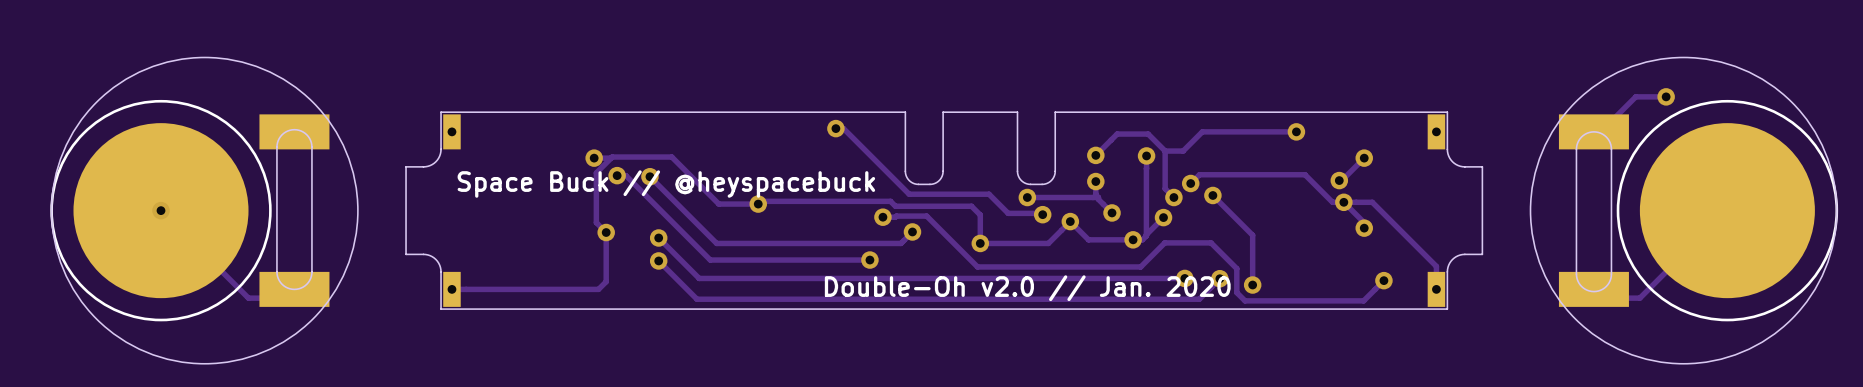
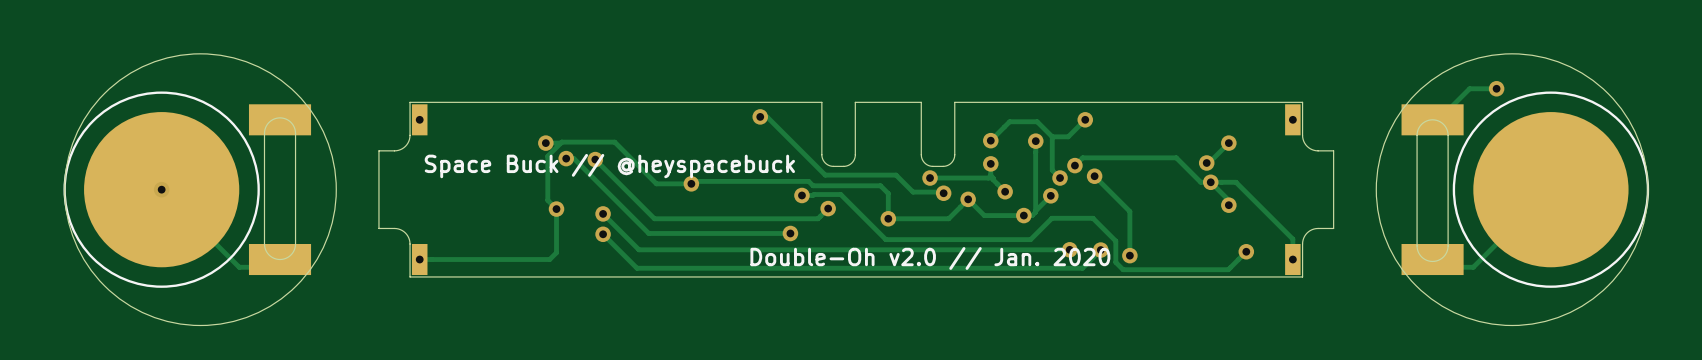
track: (1296, 131) (1202, 131) -> none
via position: (1296, 131) -> (1085, 119)

